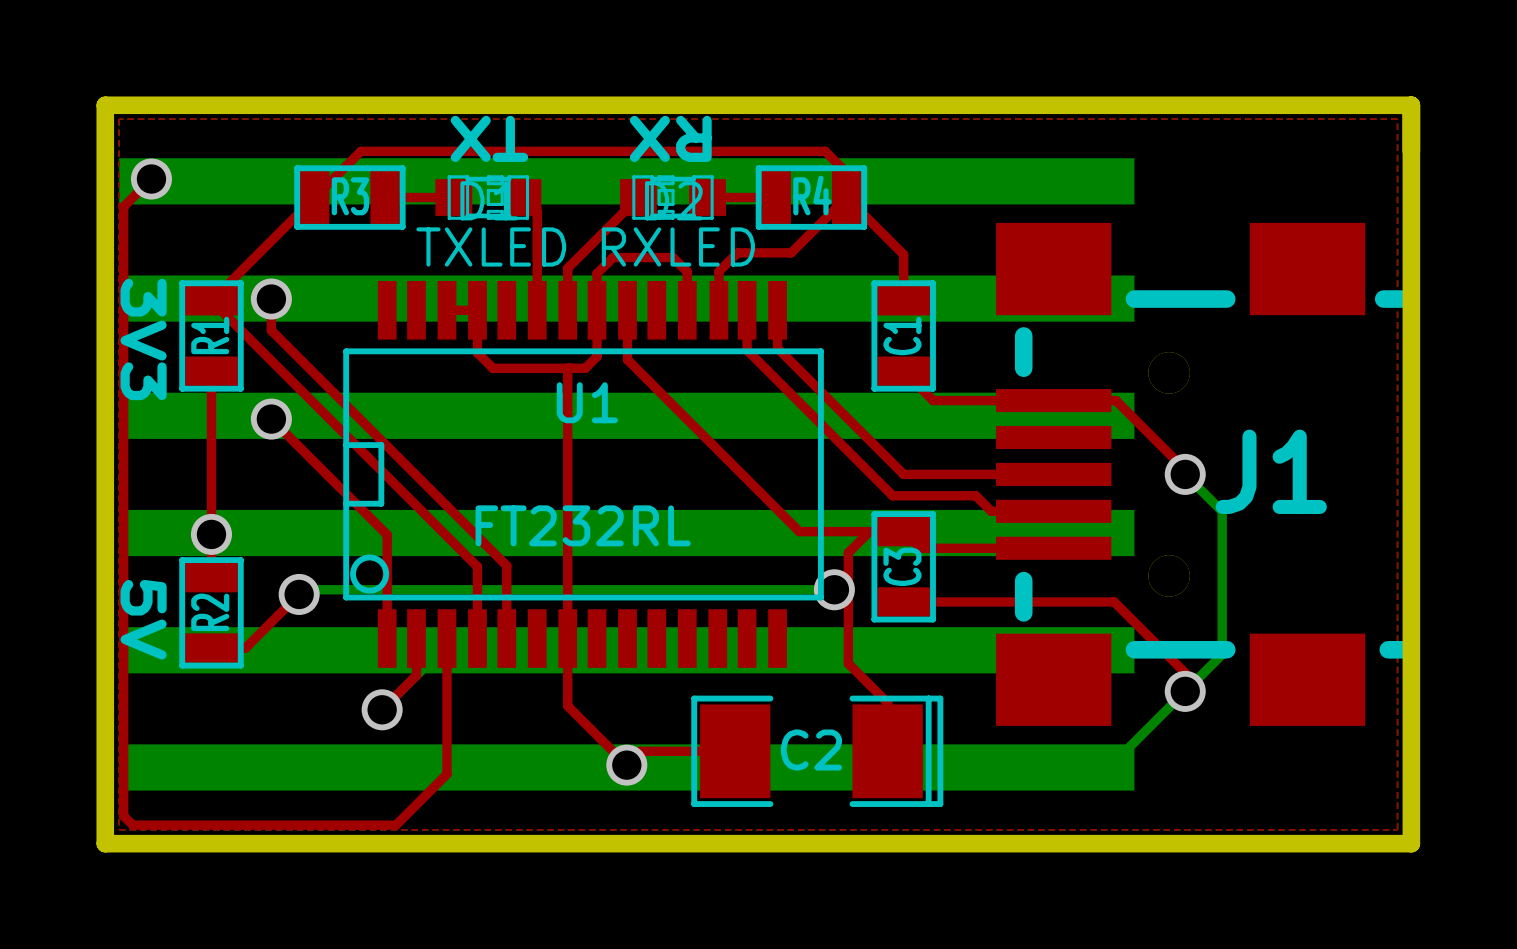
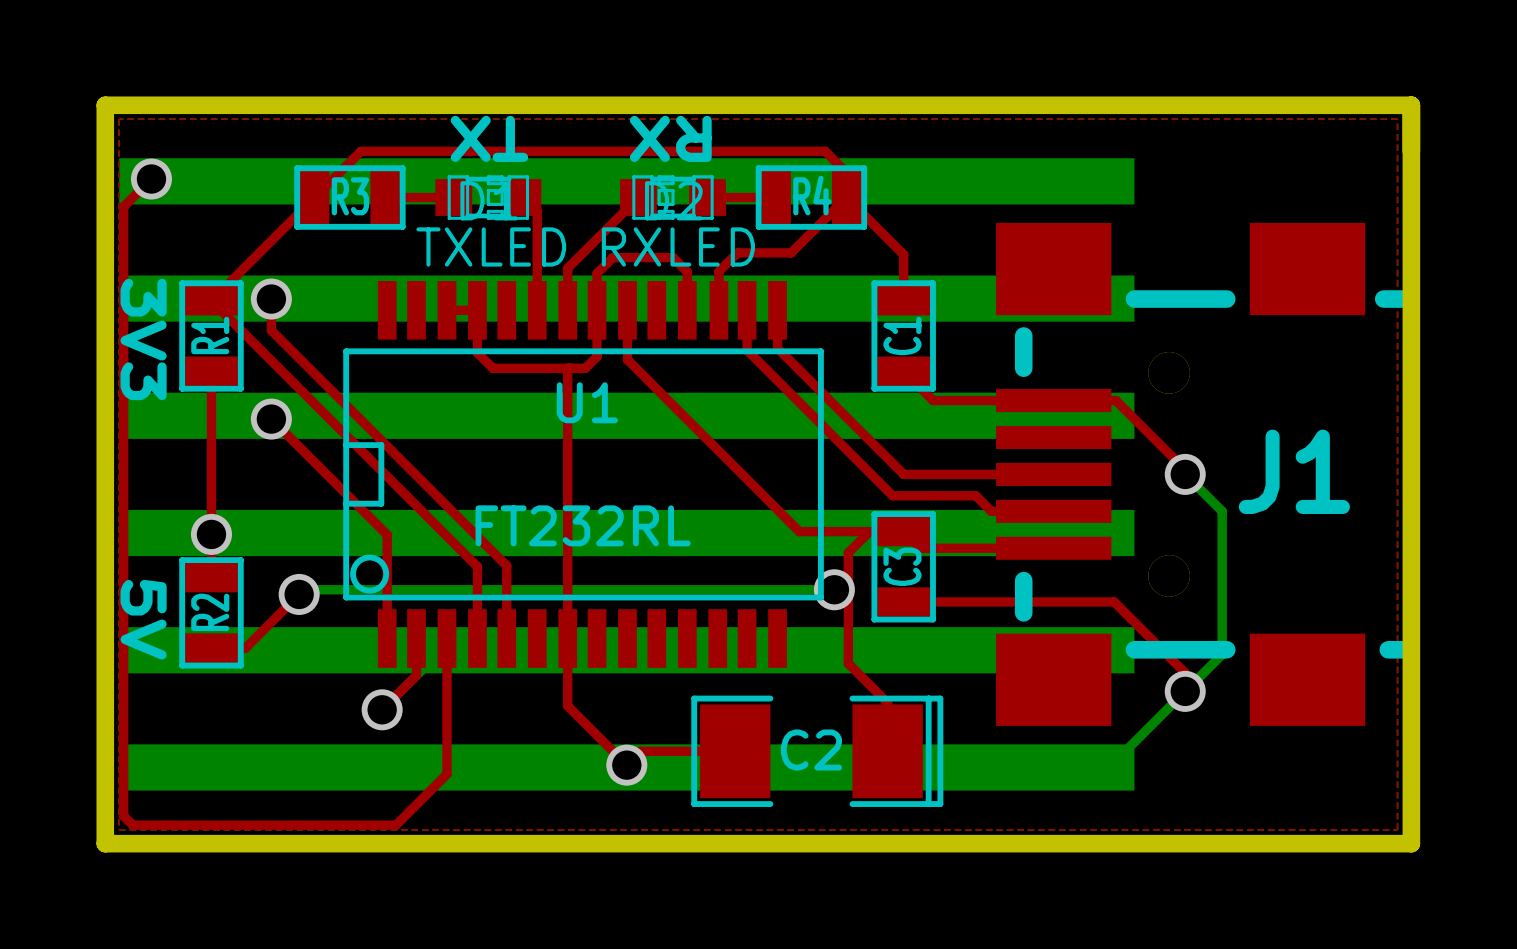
J1 name position: J1 (1271, 471) -> J1 (1294, 471)

